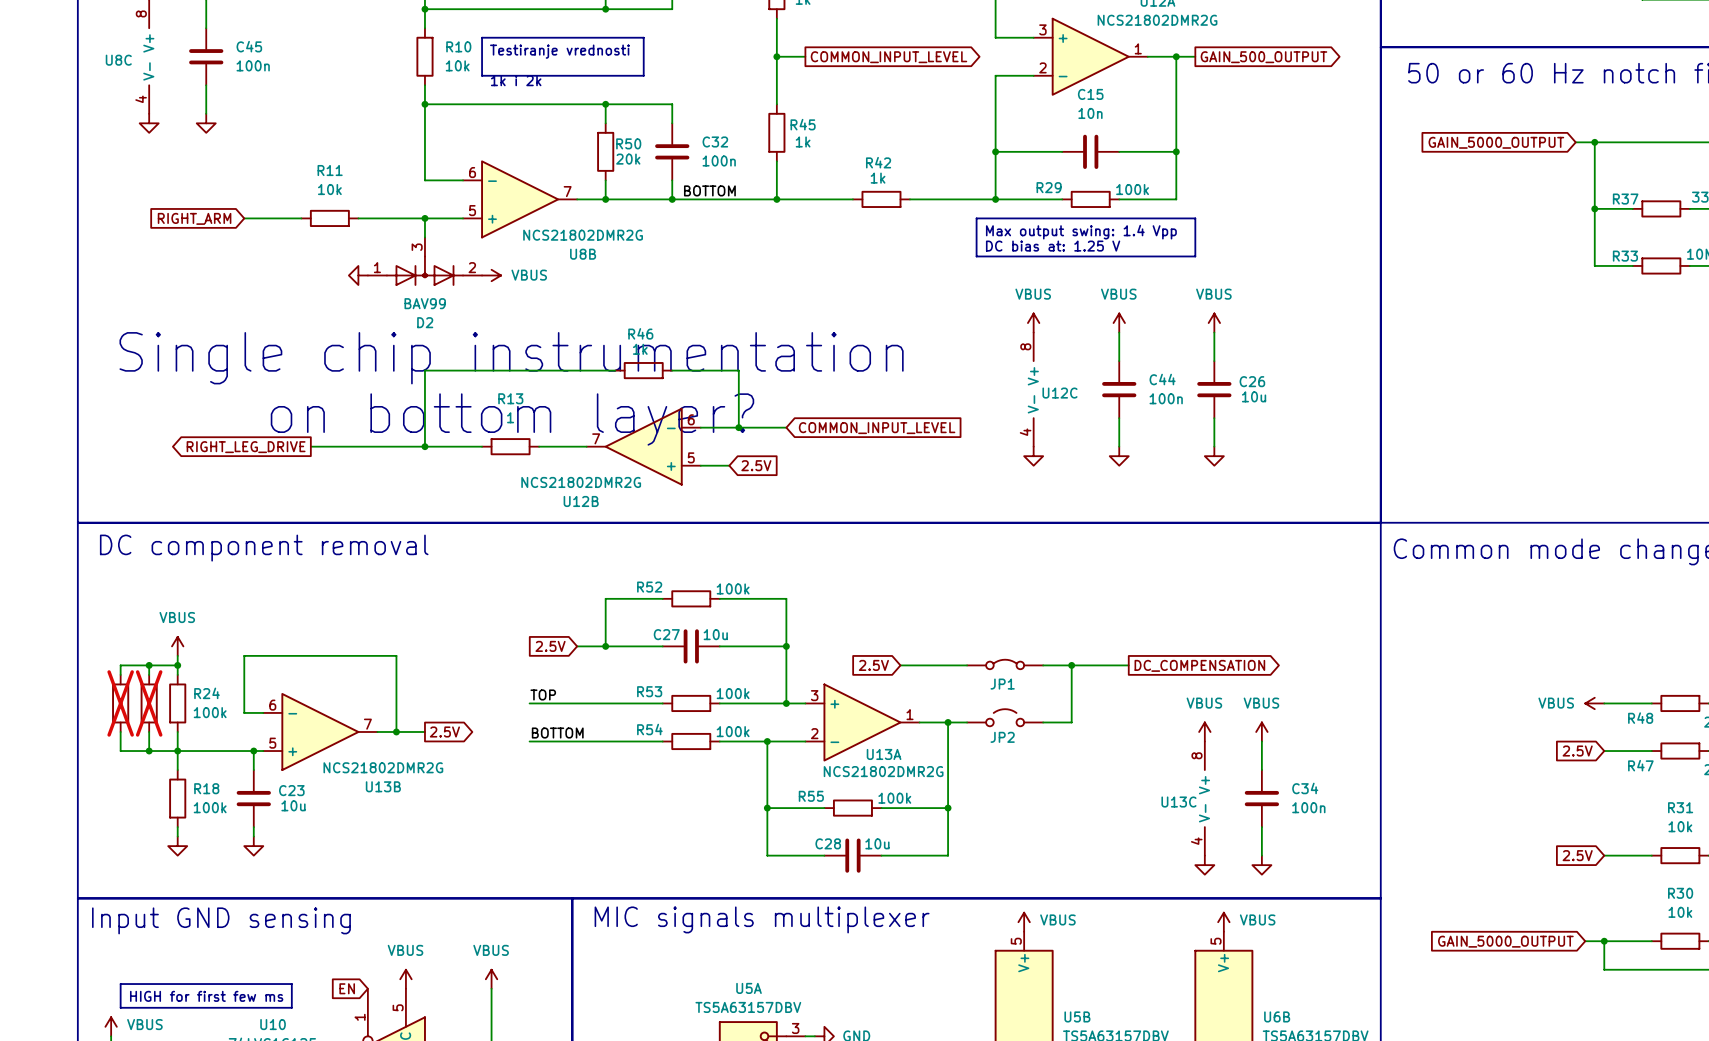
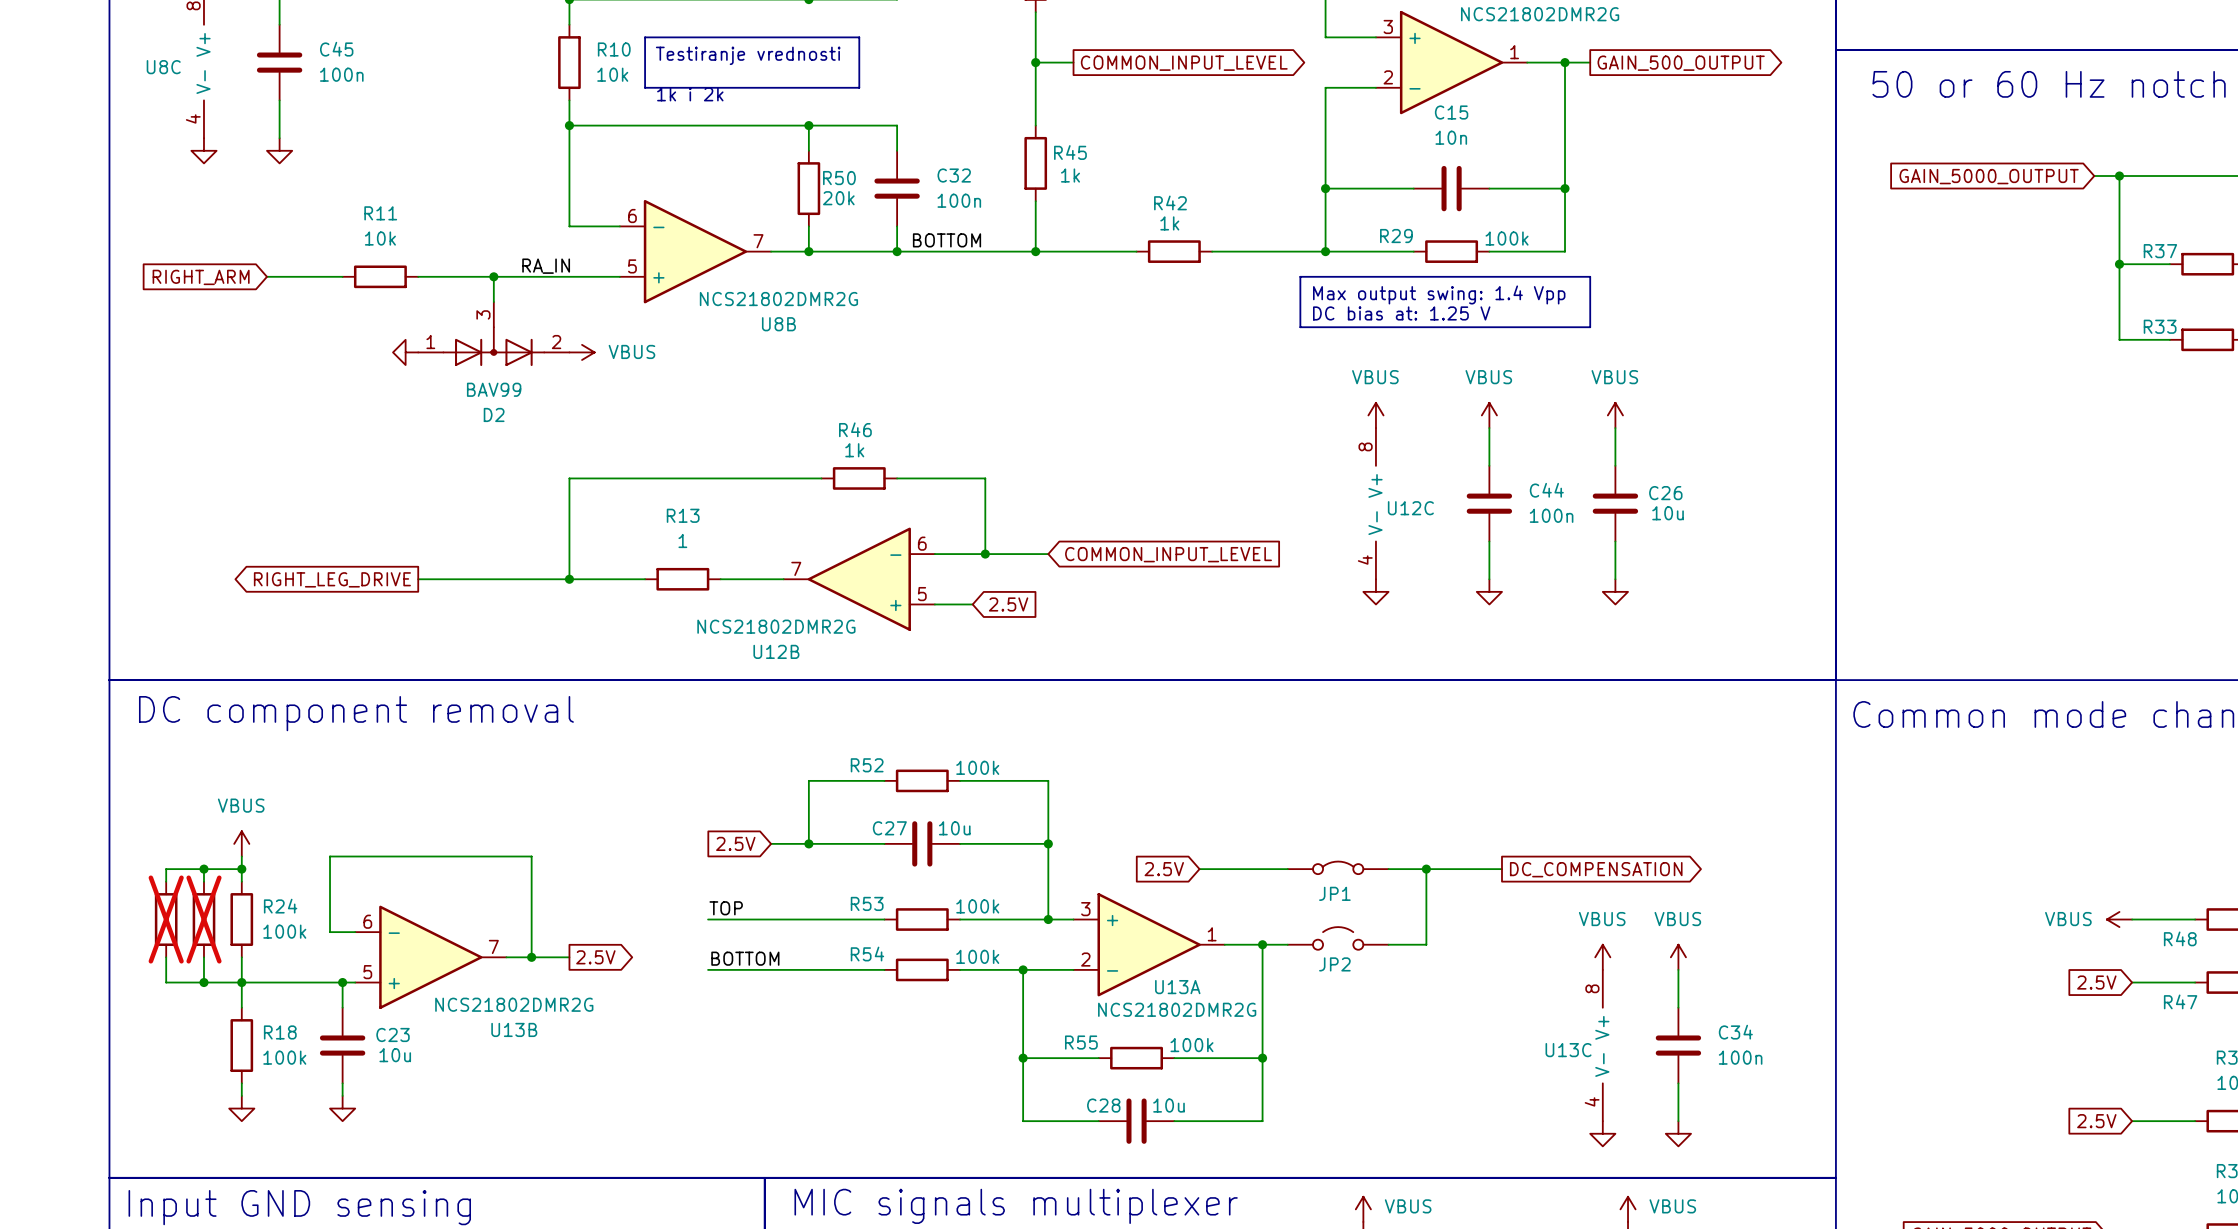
label: none -> RA_IN (546, 266)
global label position: RIGHT_ARM (194, 218) -> RIGHT_ARM (201, 277)
wire: (253, 218) (301, 218) -> (267, 276) (330, 276)
wire: none -> (418, 276) (481, 276)
R11 position: (329, 218) -> (380, 276)
junction: none -> (493, 276)
wire: (424, 218) (424, 237) -> (493, 276) (493, 302)
junction: (424, 218) -> none
D2 position: (424, 261) -> (493, 334)
power symbol position: (358, 275) -> (405, 352)
power symbol position: VBUS (491, 275) -> VBUS (582, 352)
text: Single chip instrumentation (511, 358) -> none
text: on bottom layer? (512, 419) -> none

